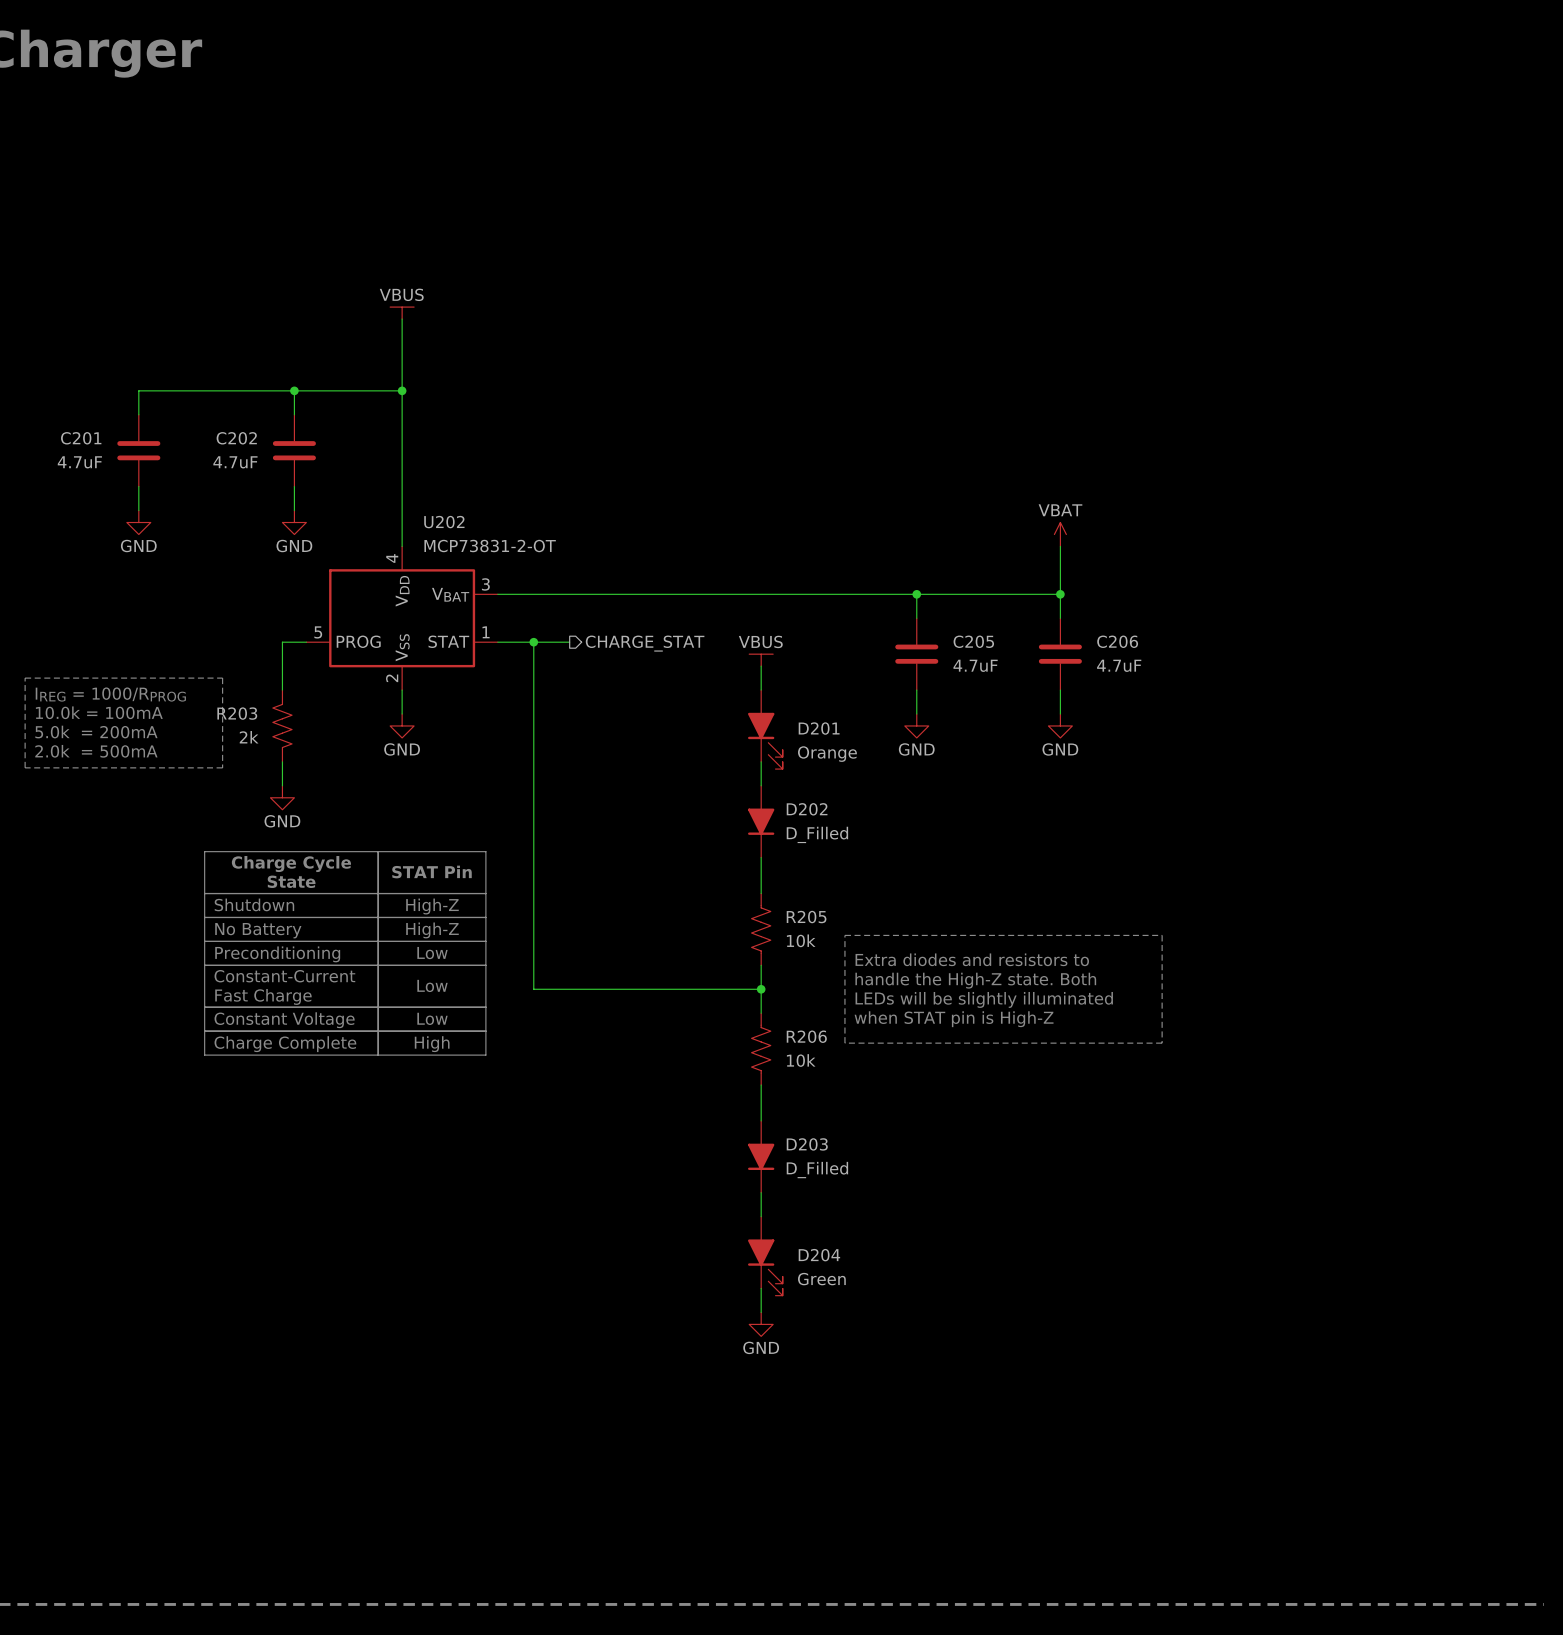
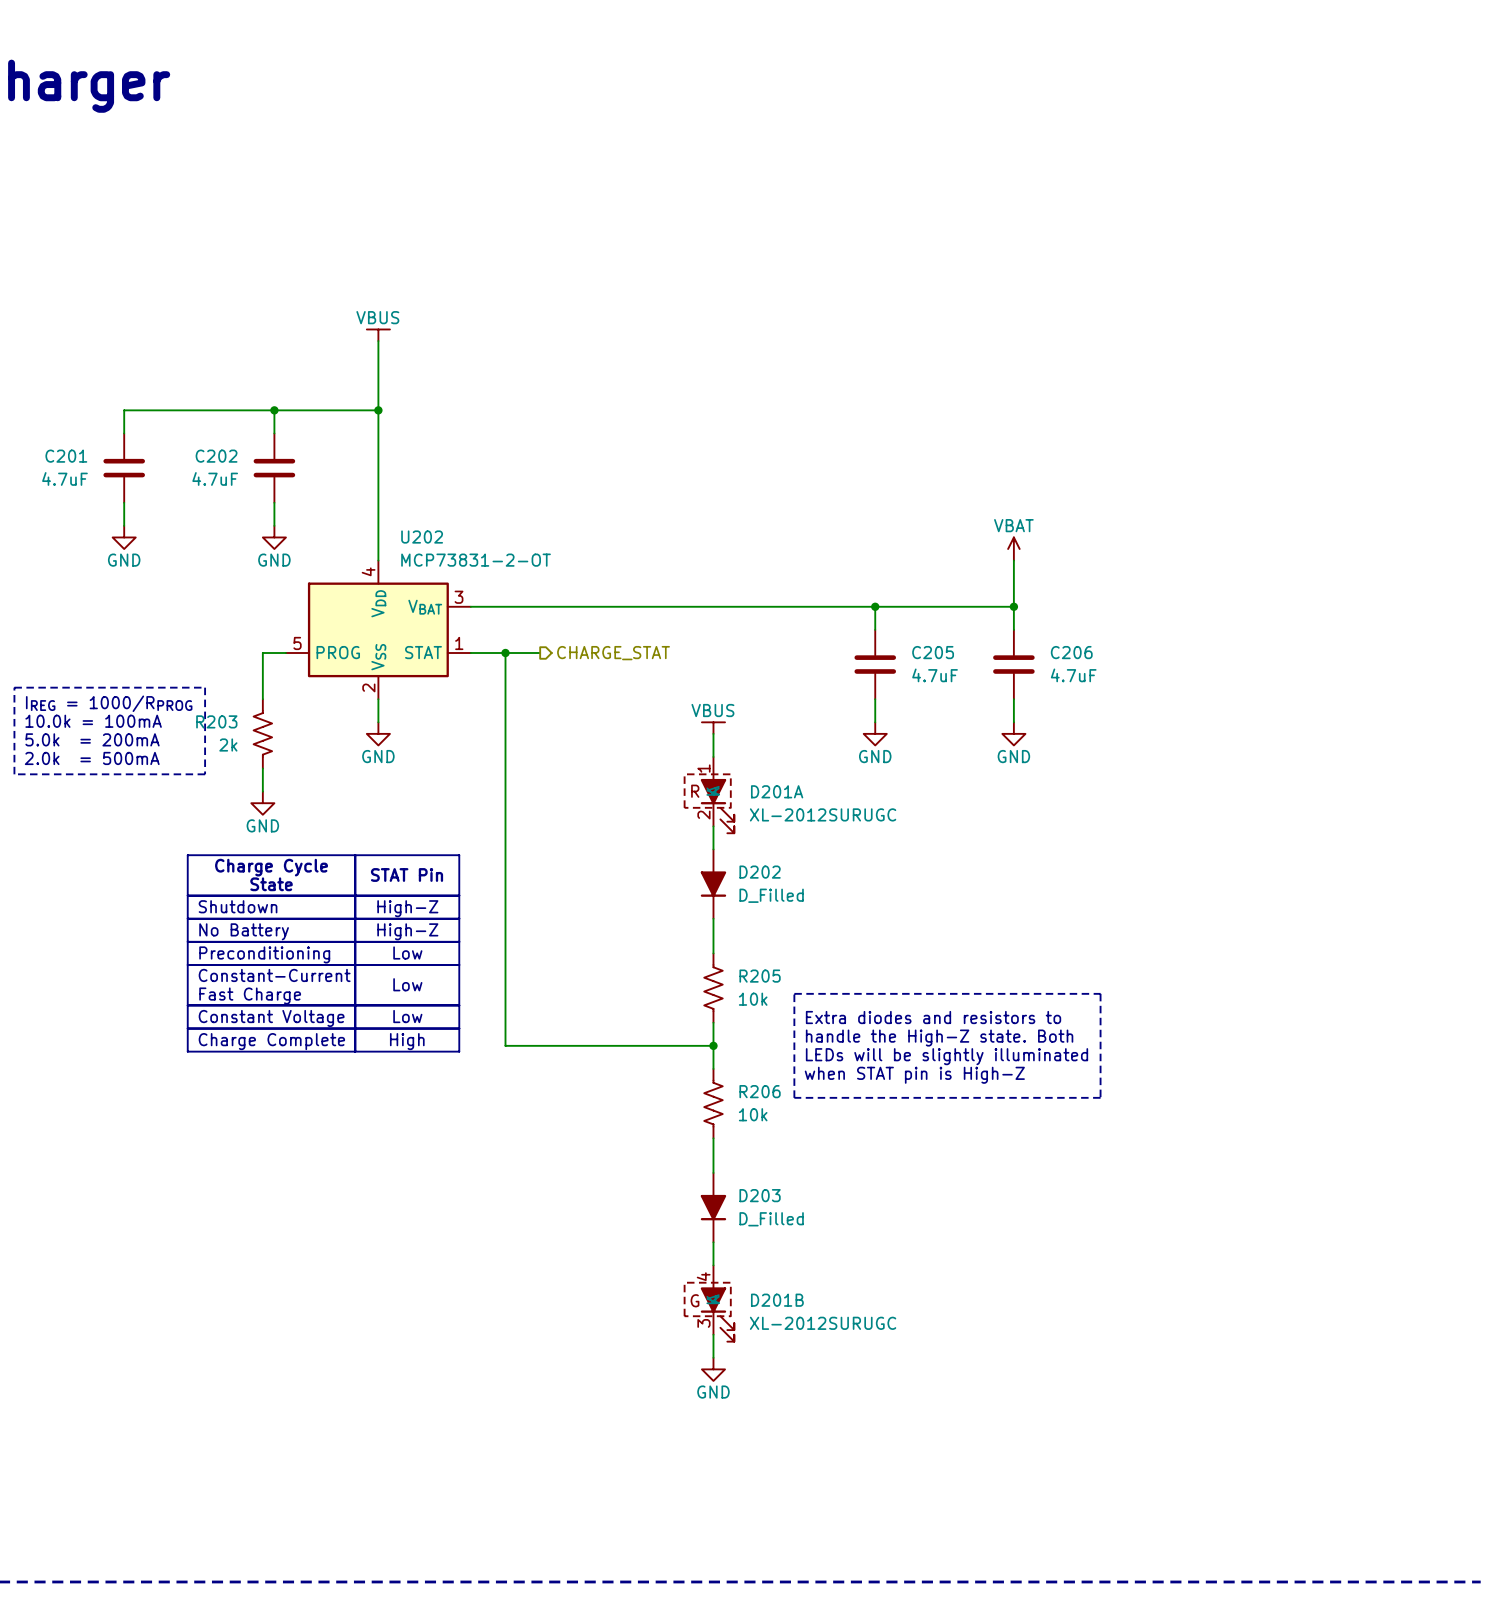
power symbol position: VBUS (761, 660) -> VBUS (713, 728)
wire: (761, 666) (761, 690) -> (713, 733) (713, 756)
D201: Orange (765, 729) -> none
wire: (761, 761) (761, 785) -> (713, 826) (713, 849)
D201A: none -> XL-2012SURUGC (709, 795)
D202 position: (761, 821) -> (713, 884)
wire: (761, 857) (761, 893) -> (713, 918) (713, 953)
R205 position: (761, 929) -> (713, 988)
line: (844, 935) (1162, 935) (1162, 1043) (844, 1043) (844, 935) -> (794, 993) (1100, 993) (1100, 1097) (794, 1097) (794, 993)
text position: Extra diodes and resistors to (972, 959) -> Extra diodes and resistors to (933, 1017)
wire: (761, 965) (761, 1013) -> (713, 1022) (713, 1068)
text position: handle the High-Z state. Both (975, 980) -> handle the High-Z state. Both (939, 1038)
wire: (533, 989) (761, 989) -> (505, 988) (505, 1045) (713, 1045)
junction: (761, 989) -> none
text position: LEDs will be slightly illuminated (984, 999) -> LEDs will be slightly illuminated (946, 1056)
text position: when STAT pin is High-Z (954, 1019) -> when STAT pin is High-Z (914, 1075)
junction: none -> (713, 1045)
R206 position: (761, 1049) -> (713, 1103)
wire: (761, 1085) (761, 1120) -> (713, 1138) (713, 1172)
D203 position: (761, 1156) -> (713, 1207)
wire: (761, 1192) (761, 1216) -> (713, 1242) (713, 1265)
D204: Green (765, 1256) -> none
wire: (761, 1288) (761, 1312) -> (713, 1334) (713, 1357)
D201B: none -> XL-2012SURUGC (709, 1303)
power symbol position: GND (761, 1324) -> GND (713, 1369)

